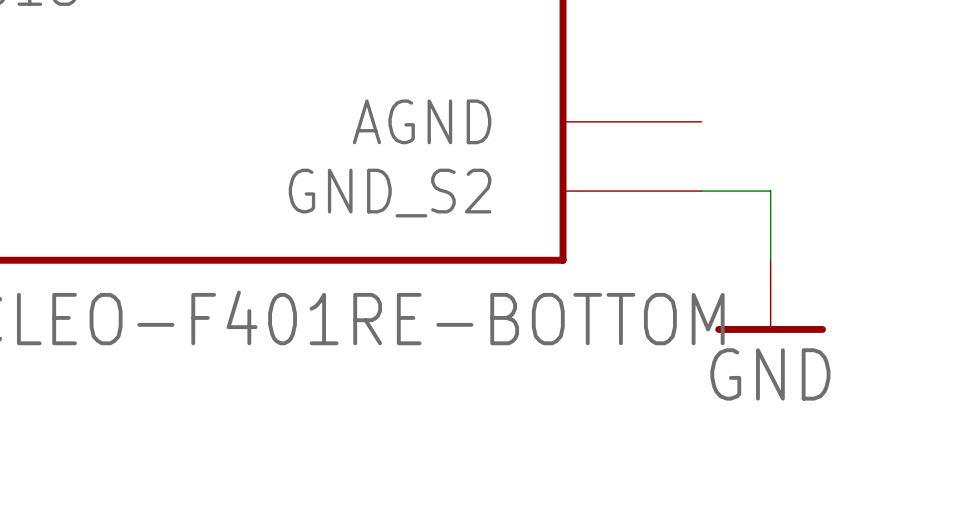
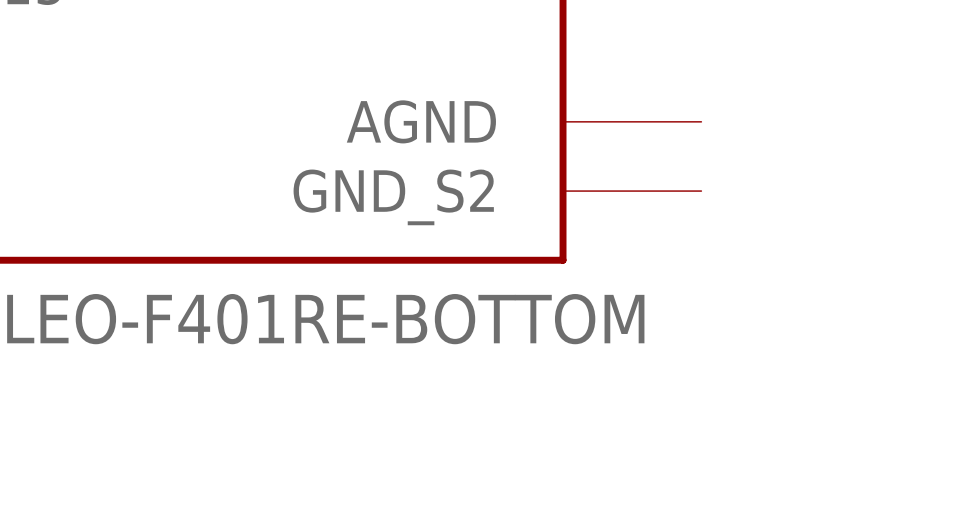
wire: (701, 191) (770, 191) (770, 260) -> none
power symbol: GND (770, 296) -> none

